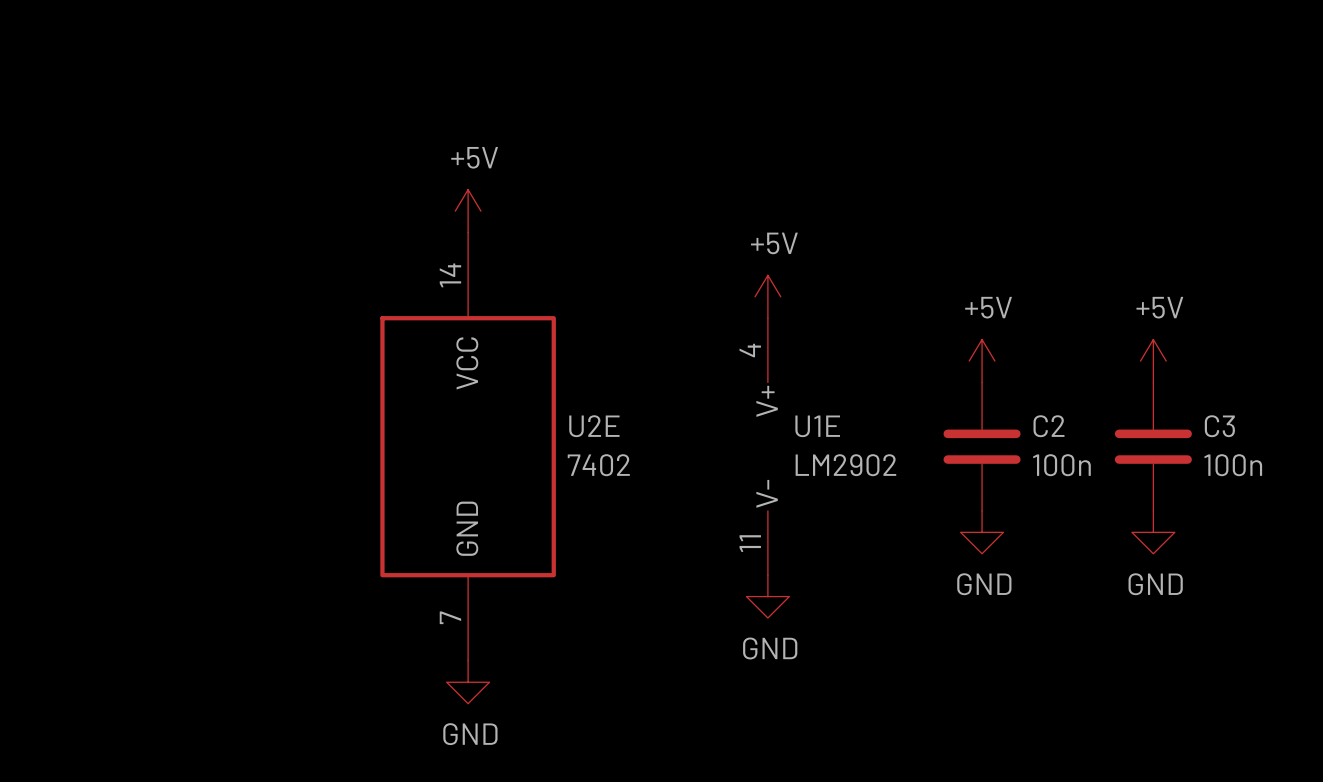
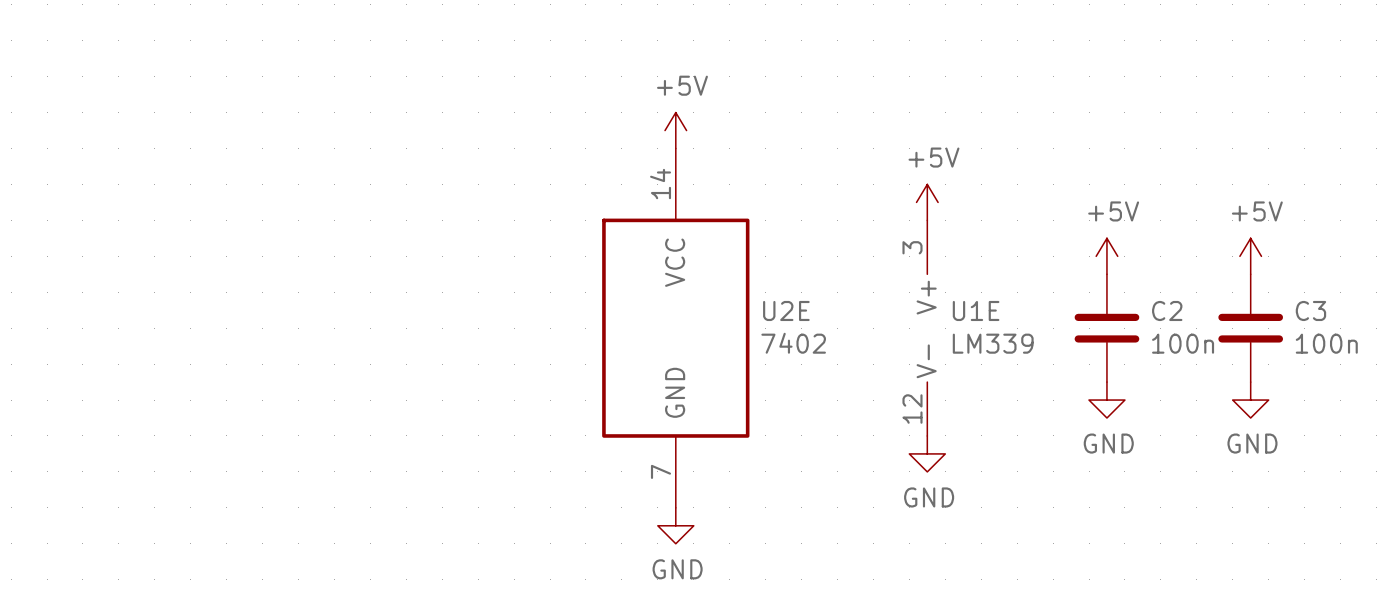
U1E pin number: 4 (750, 350) -> 3 (912, 247)
U1E value: LM2902 (845, 465) -> LM339 (993, 343)
U1E pin number: 11 (750, 543) -> 12 (912, 409)

